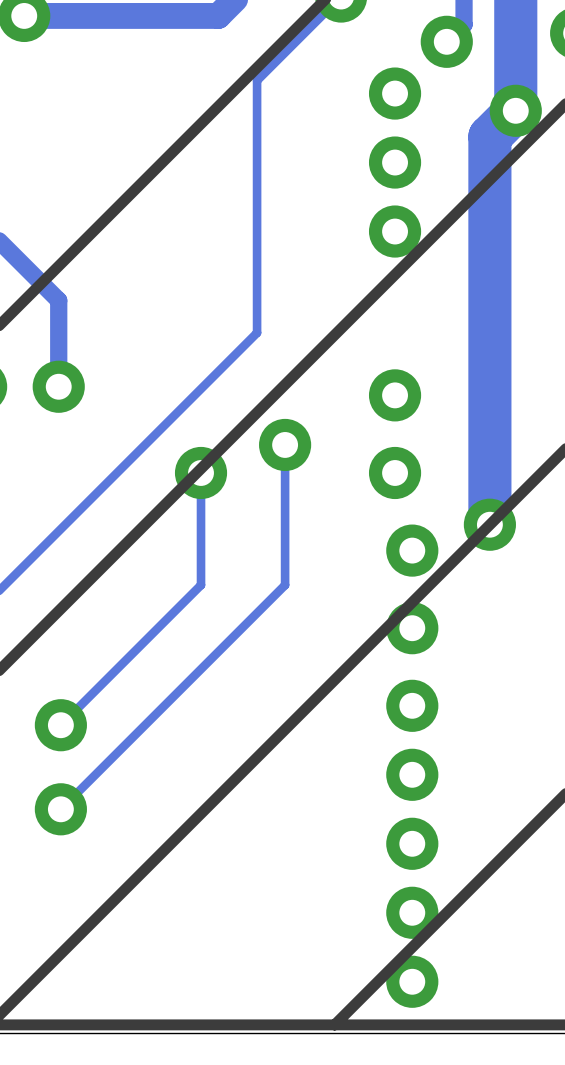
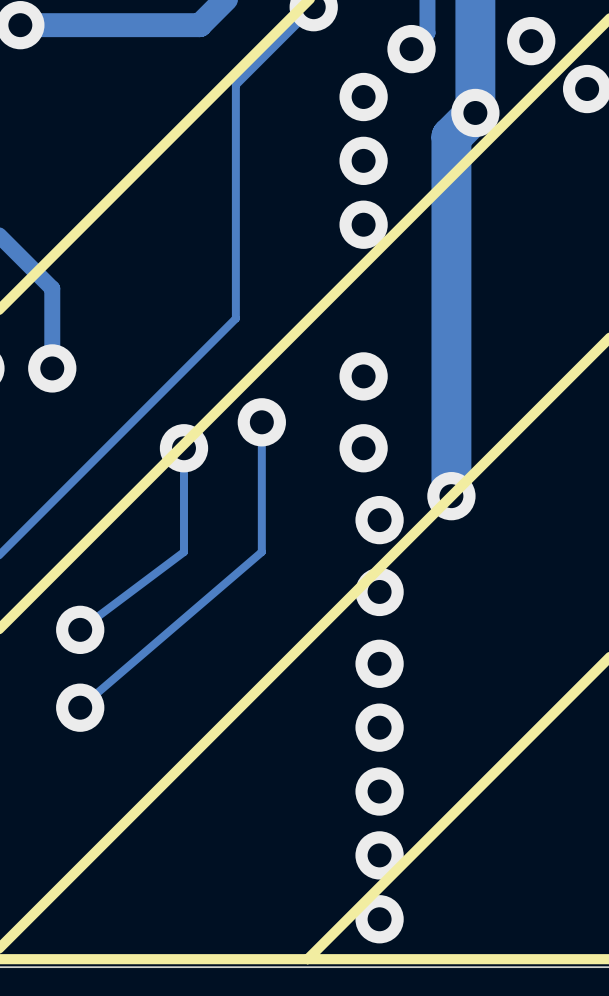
track: (201, 585) (60, 725) -> (183, 552) (80, 629)
track: (285, 585) (60, 809) -> (261, 552) (80, 707)
via: none -> (80, 629)
via position: (60, 725) -> (80, 707)
via: (60, 809) -> none

